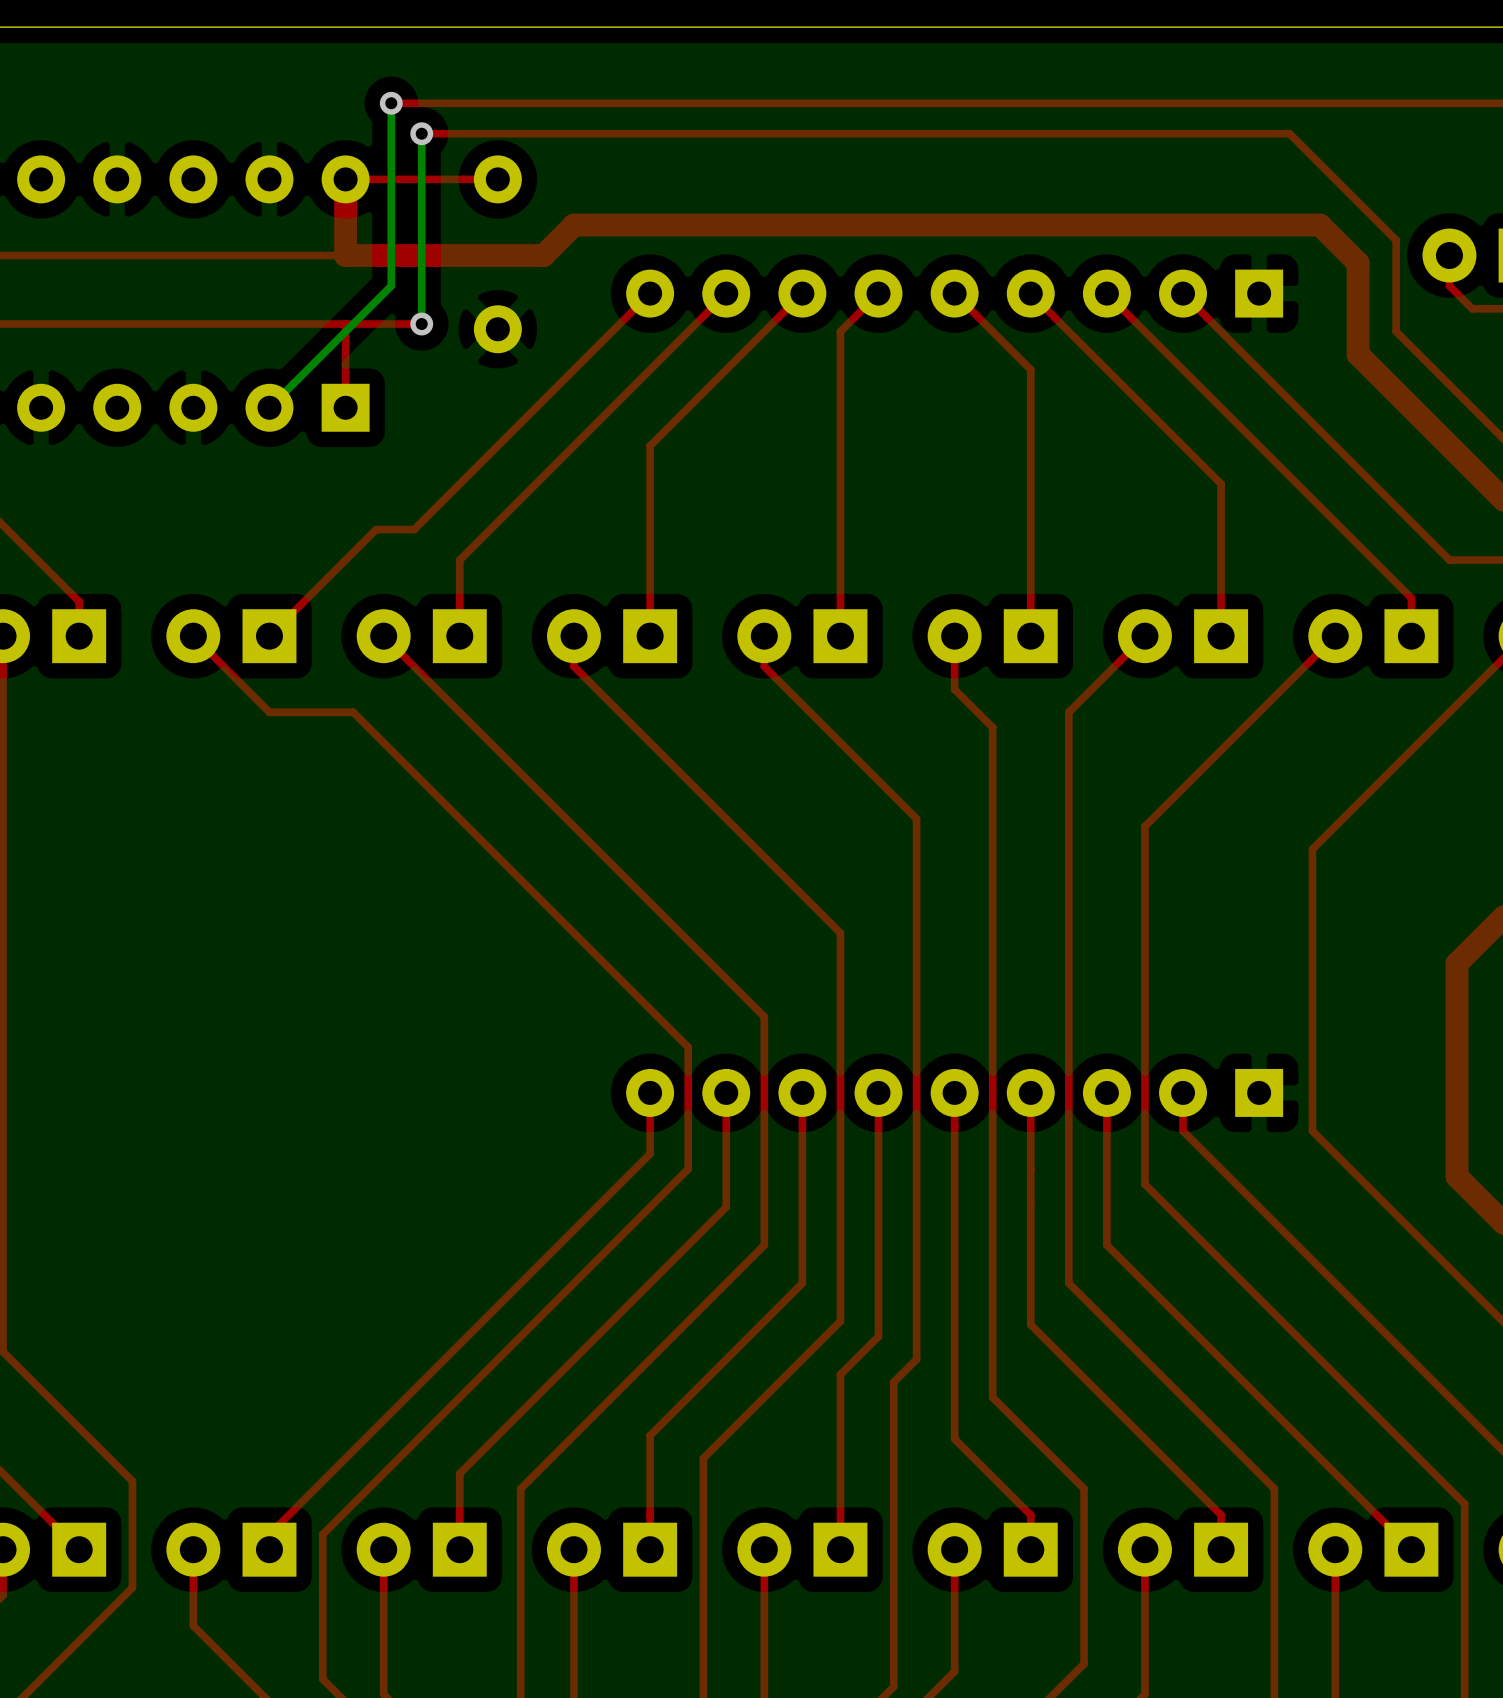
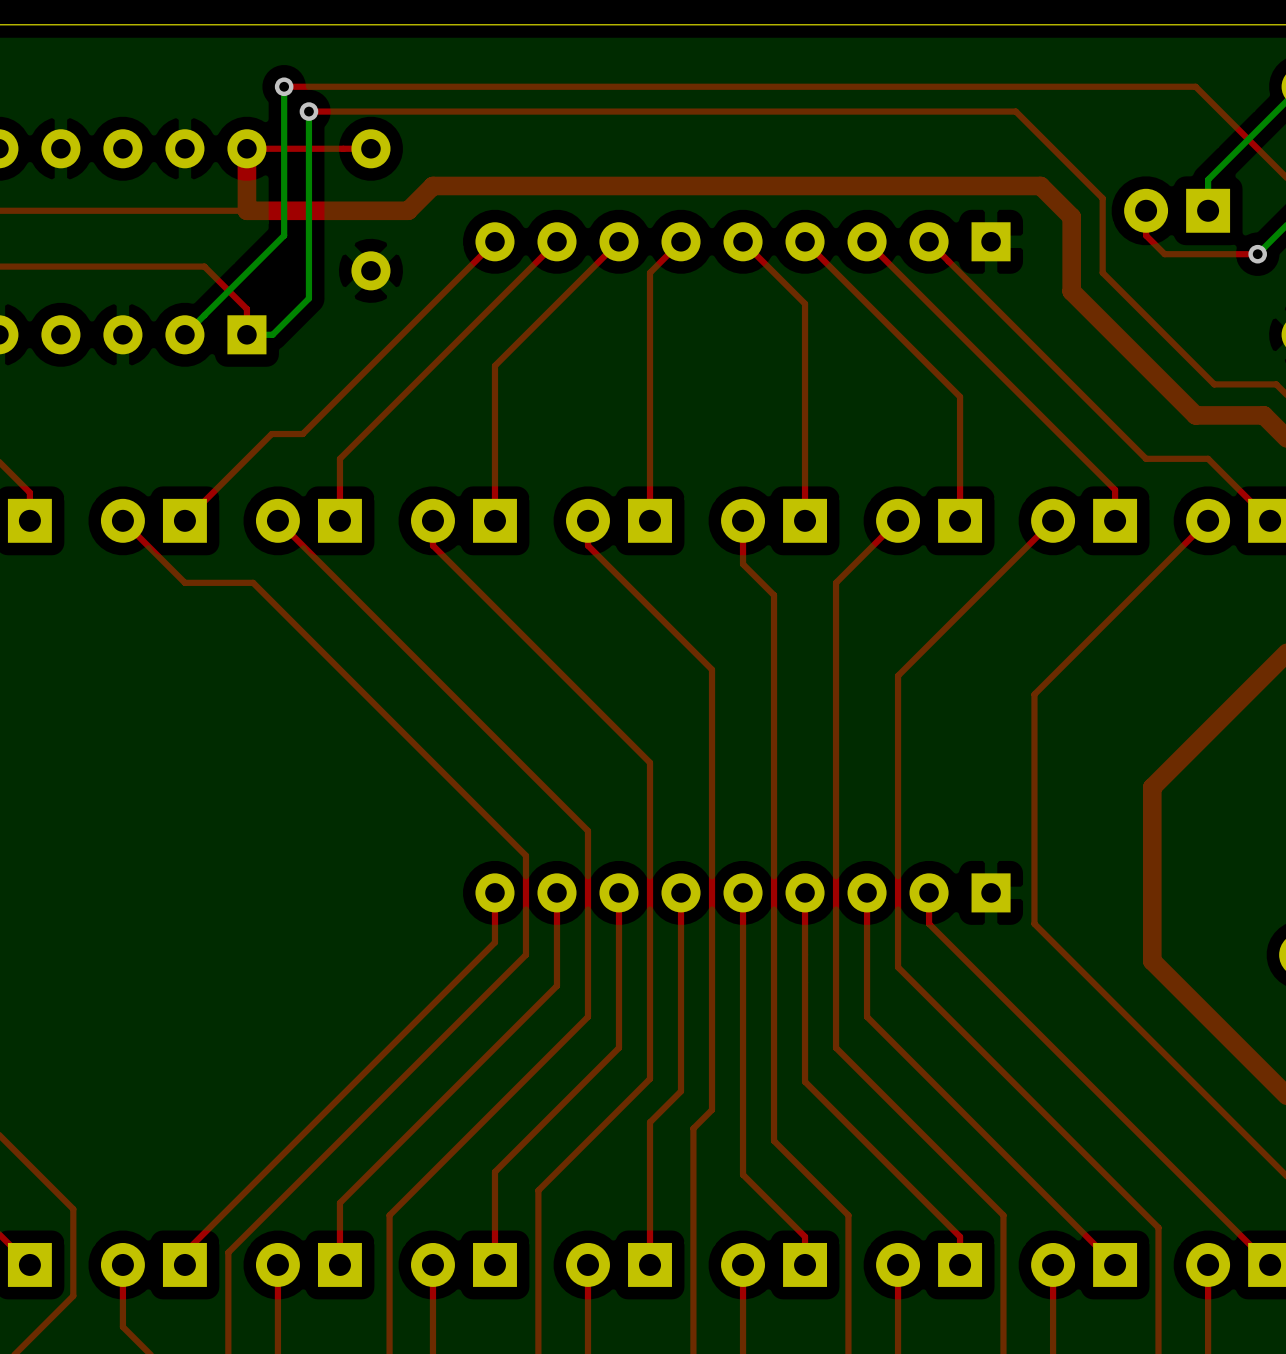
top track: (345, 324) (345, 376) -> (204, 266) (246, 309)
top track: (421, 324) (293, 324) -> none
bottom track: none -> (308, 266) (308, 298) (272, 334) (246, 334)
via: (421, 324) -> none

